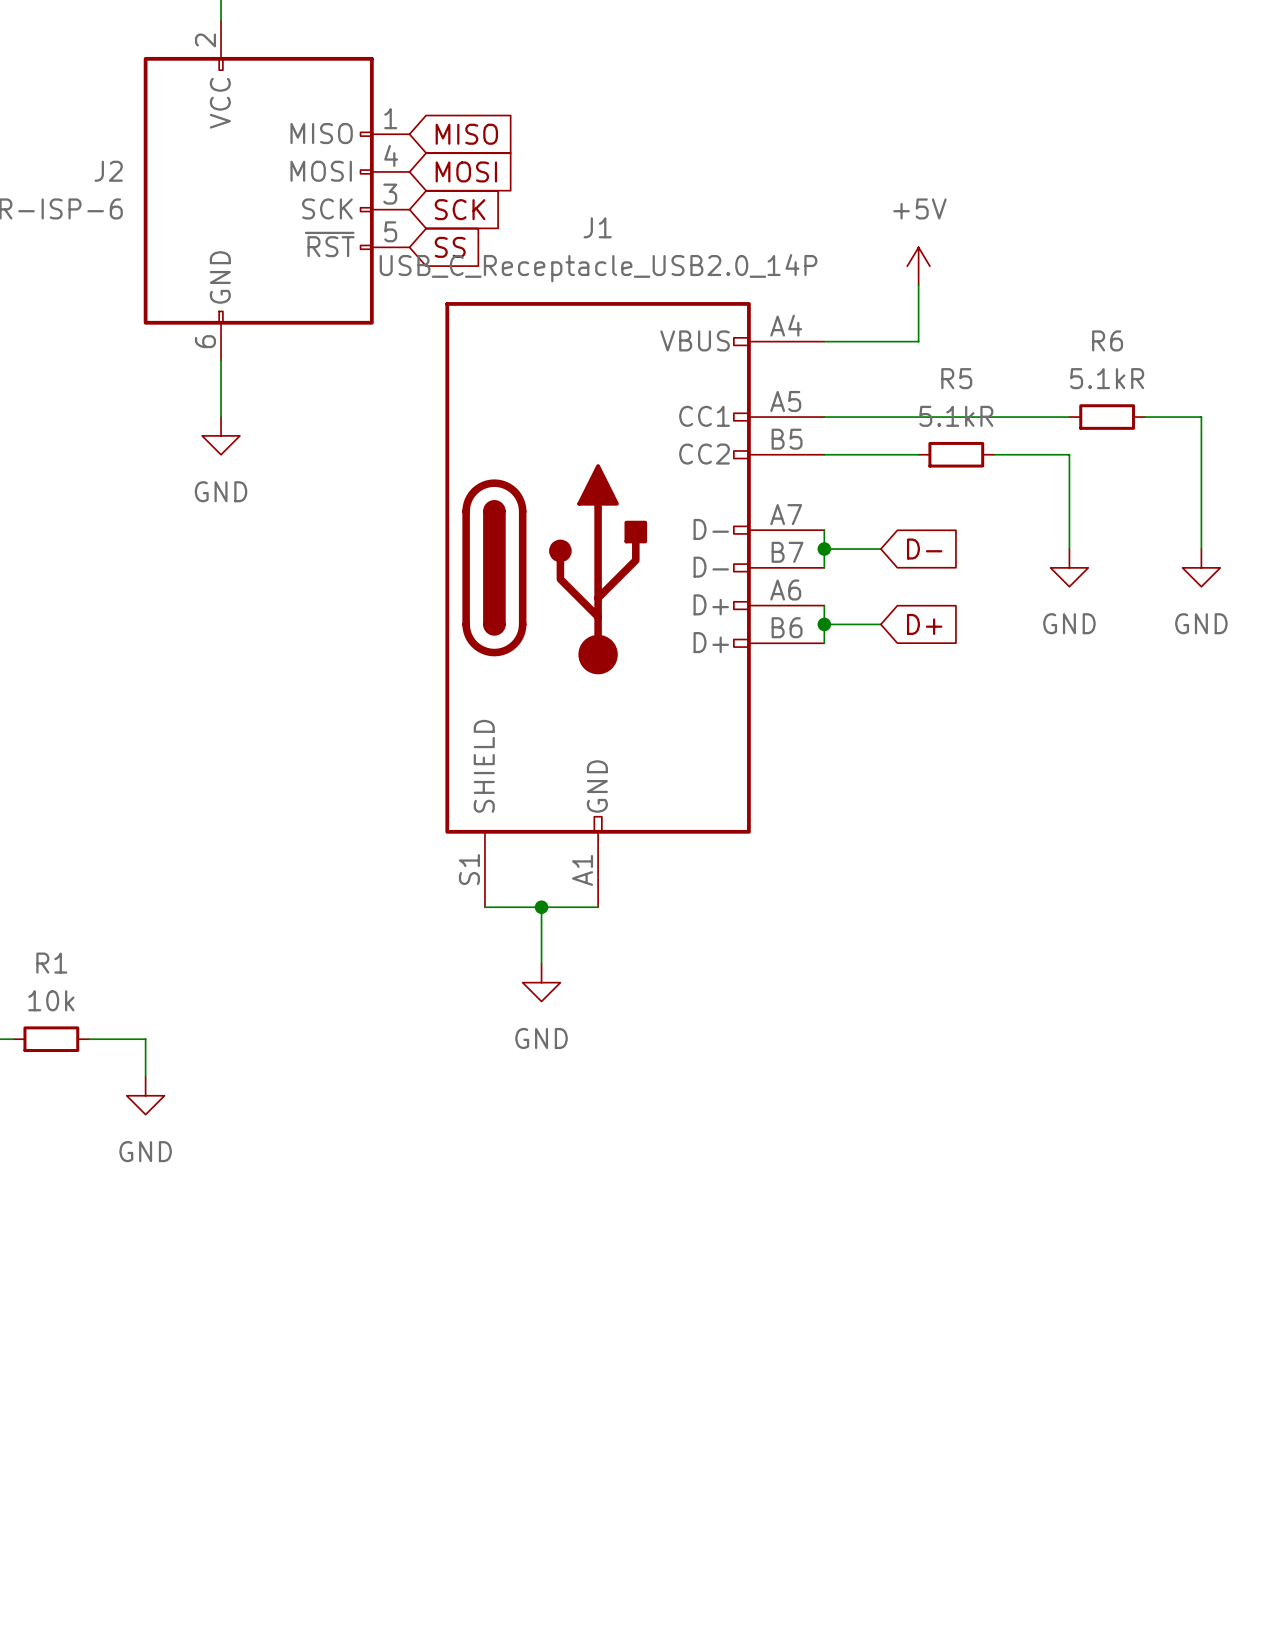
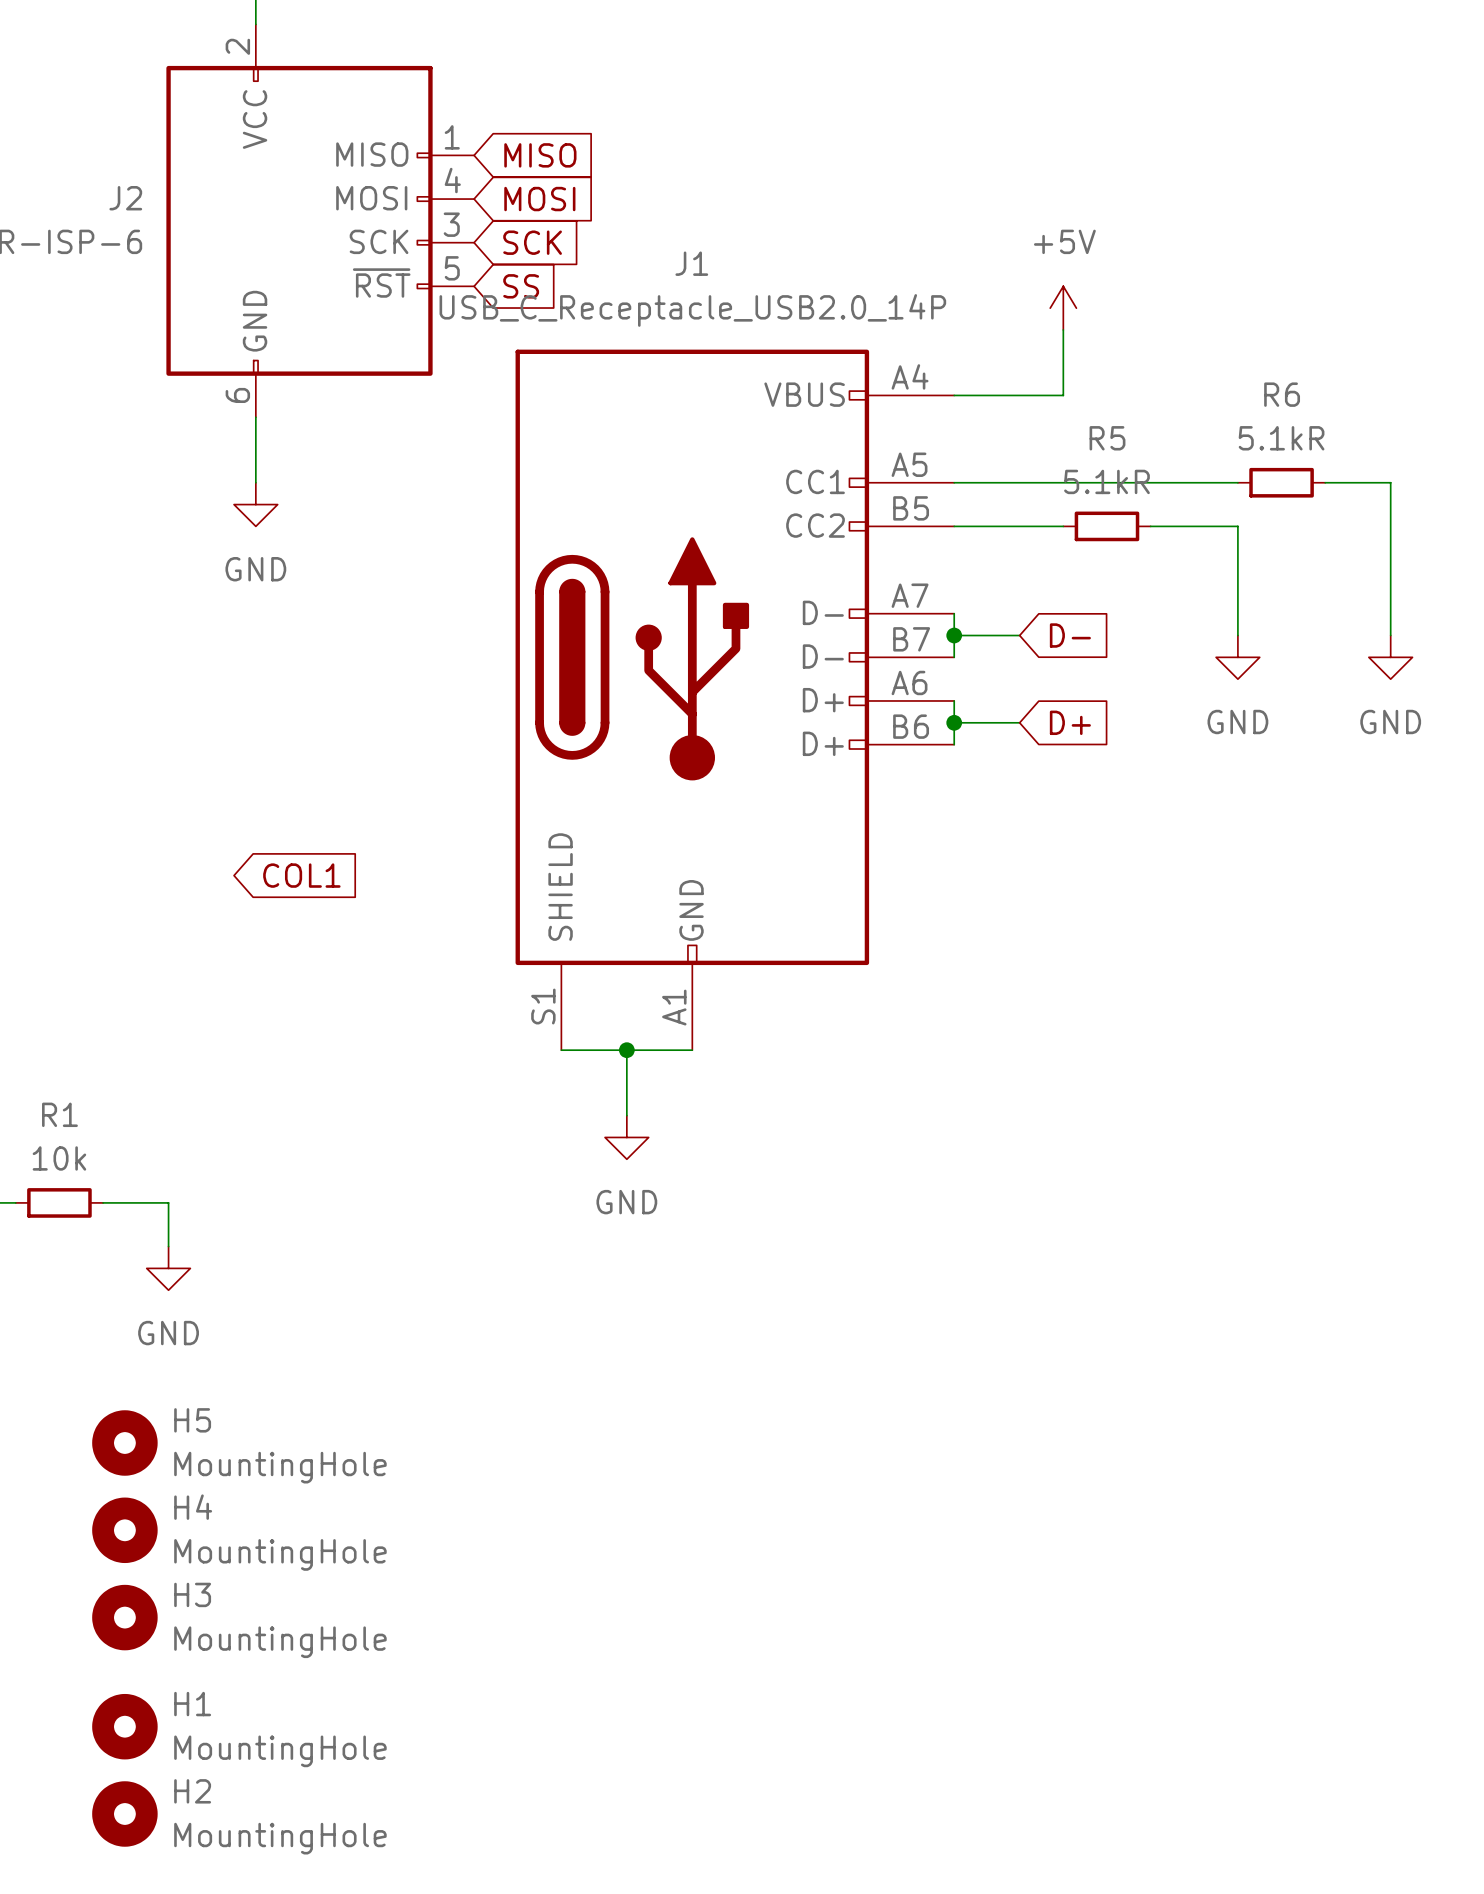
global label: none -> COL1 (301, 875)
H5: none -> MountingHole (124, 1442)
H4: none -> MountingHole (124, 1530)
H3: none -> MountingHole (124, 1617)
H1: none -> MountingHole (124, 1726)
H2: none -> MountingHole (124, 1813)

